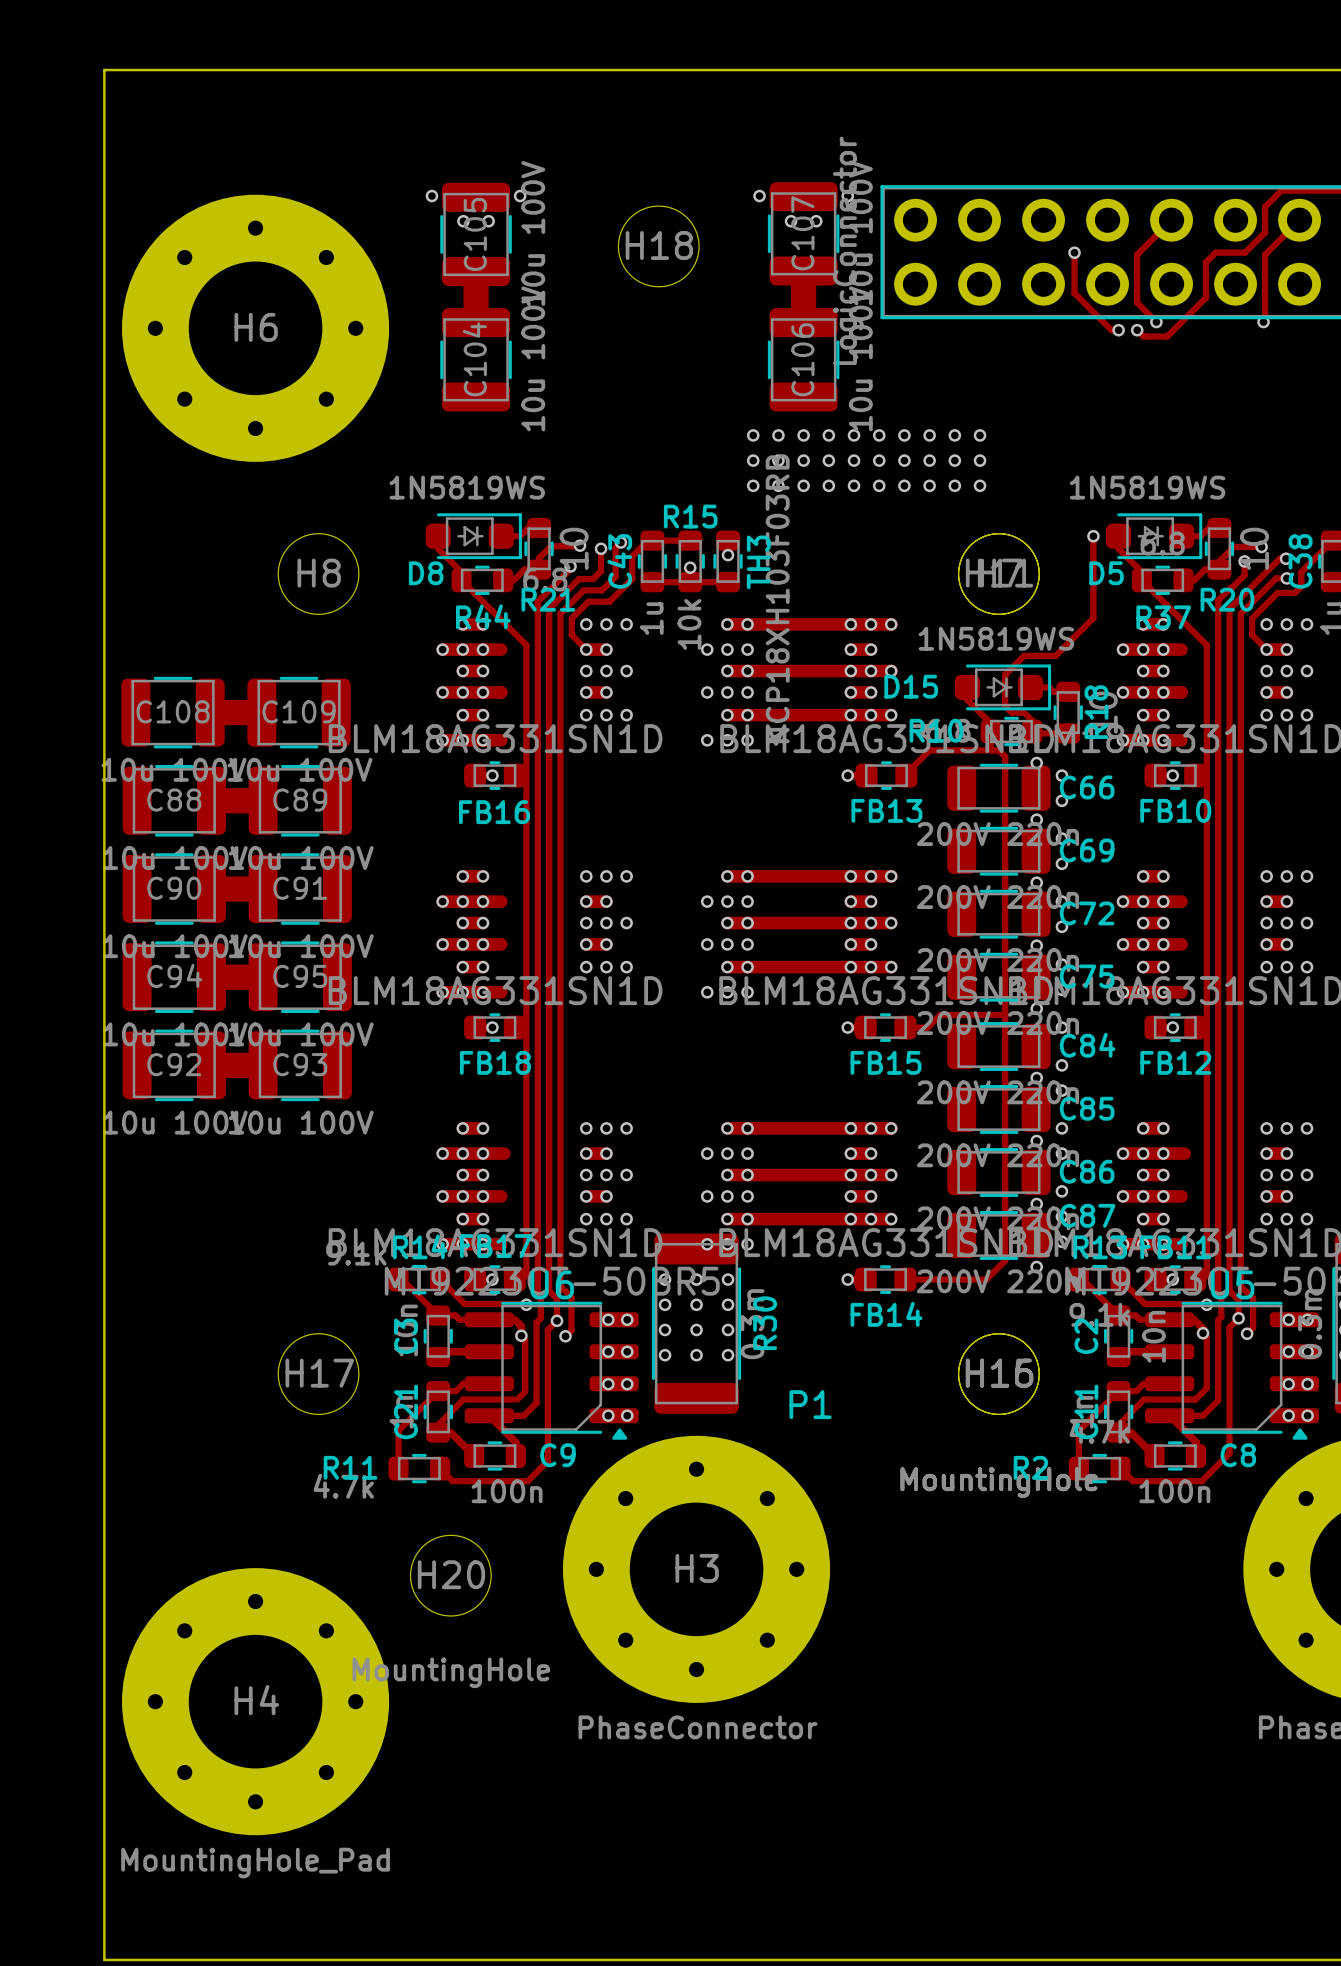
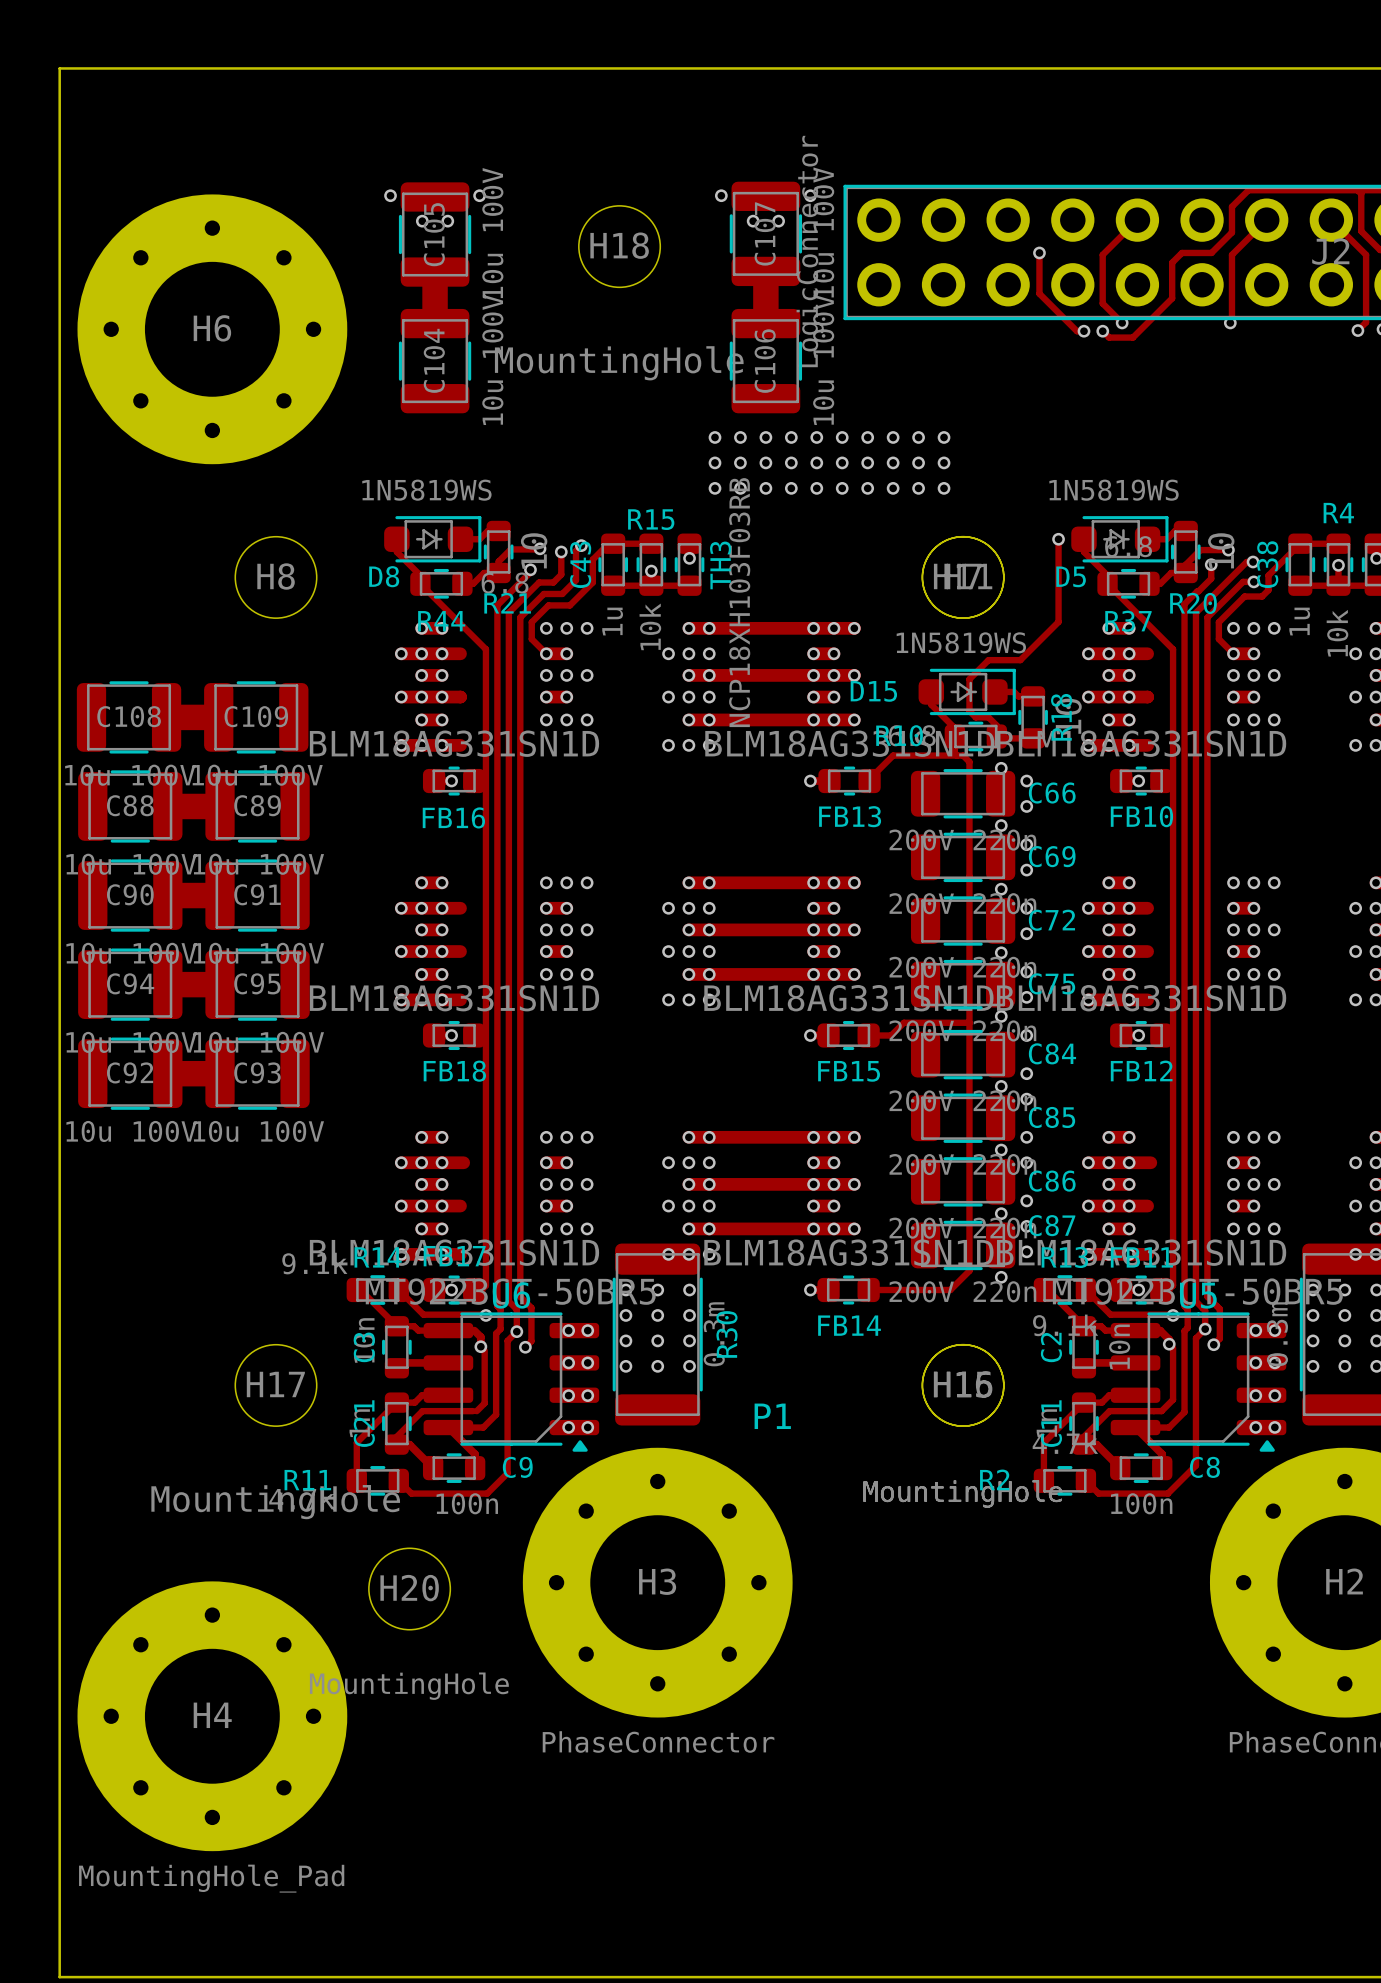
H18 value: none -> MountingHole (619, 363)
H17 value: none -> MountingHole (275, 1502)

